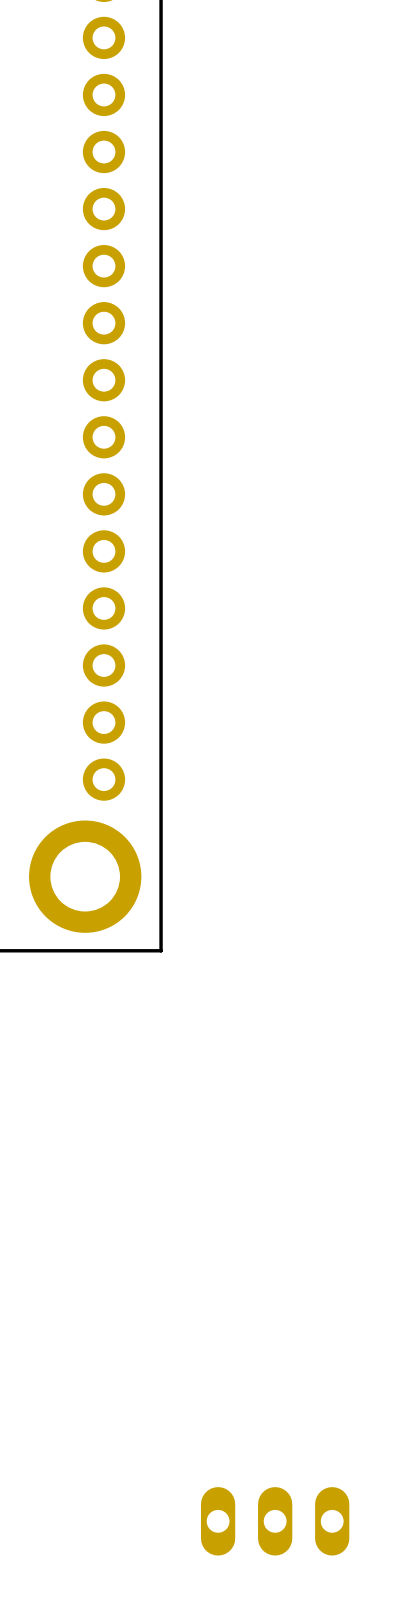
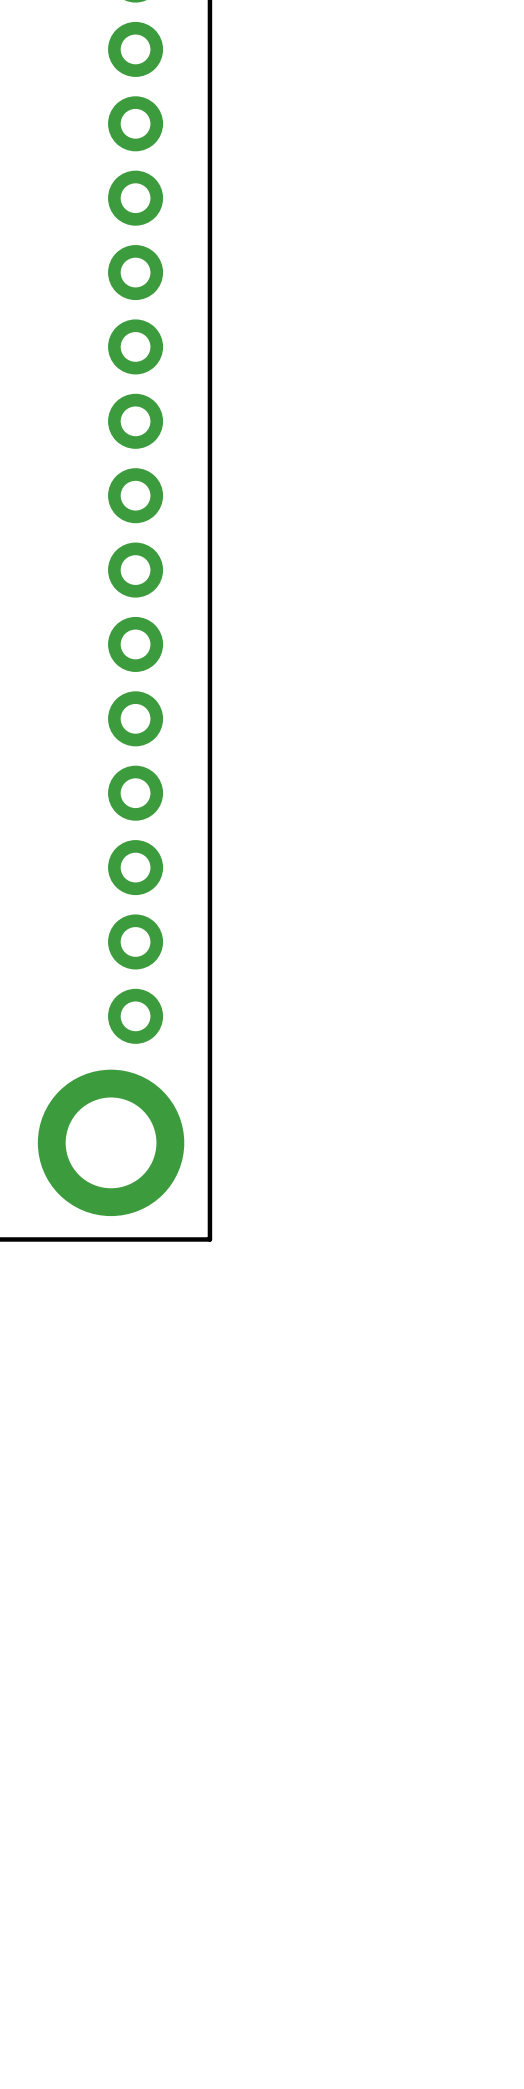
part: (275, 1521) -> none

